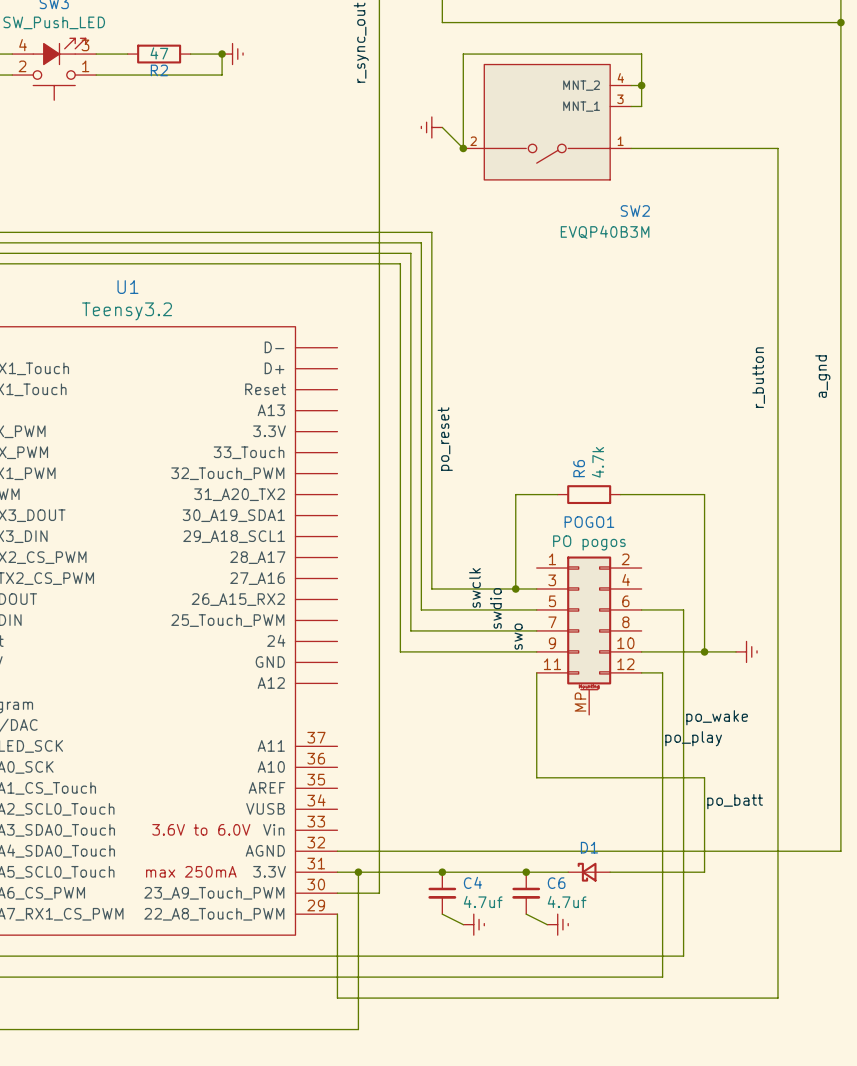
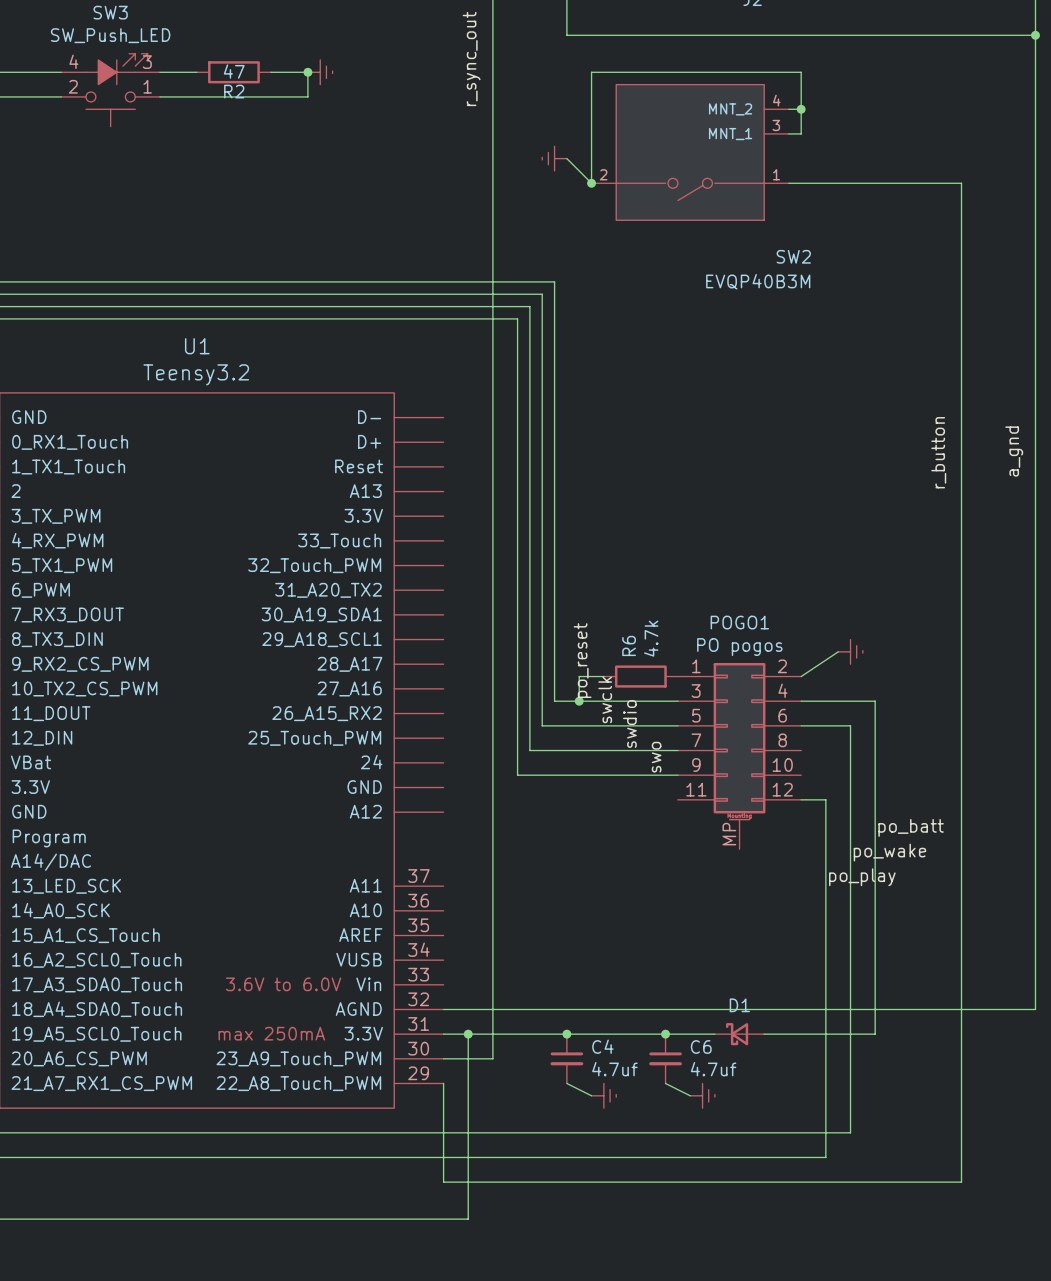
label position: po_reset (445, 439) -> po_reset (582, 660)
wire: (557, 494) (515, 494) (515, 588) -> none
R6 position: (589, 494) -> (640, 676)
wire: (620, 494) (704, 494) (704, 588) -> (801, 701) (875, 701)
wire: none -> (838, 651) (801, 676)
wire: none -> (603, 676) (579, 676) (579, 701)
junction: none -> (579, 701)
junction: (515, 588) -> none
wire: (641, 651) (736, 651) -> none
junction: (704, 651) -> none
power symbol position: (746, 651) -> (850, 651)
wire: (536, 672) (536, 777) (704, 777) -> (875, 775) (875, 923)
label position: po_batt (735, 801) -> po_batt (911, 827)

